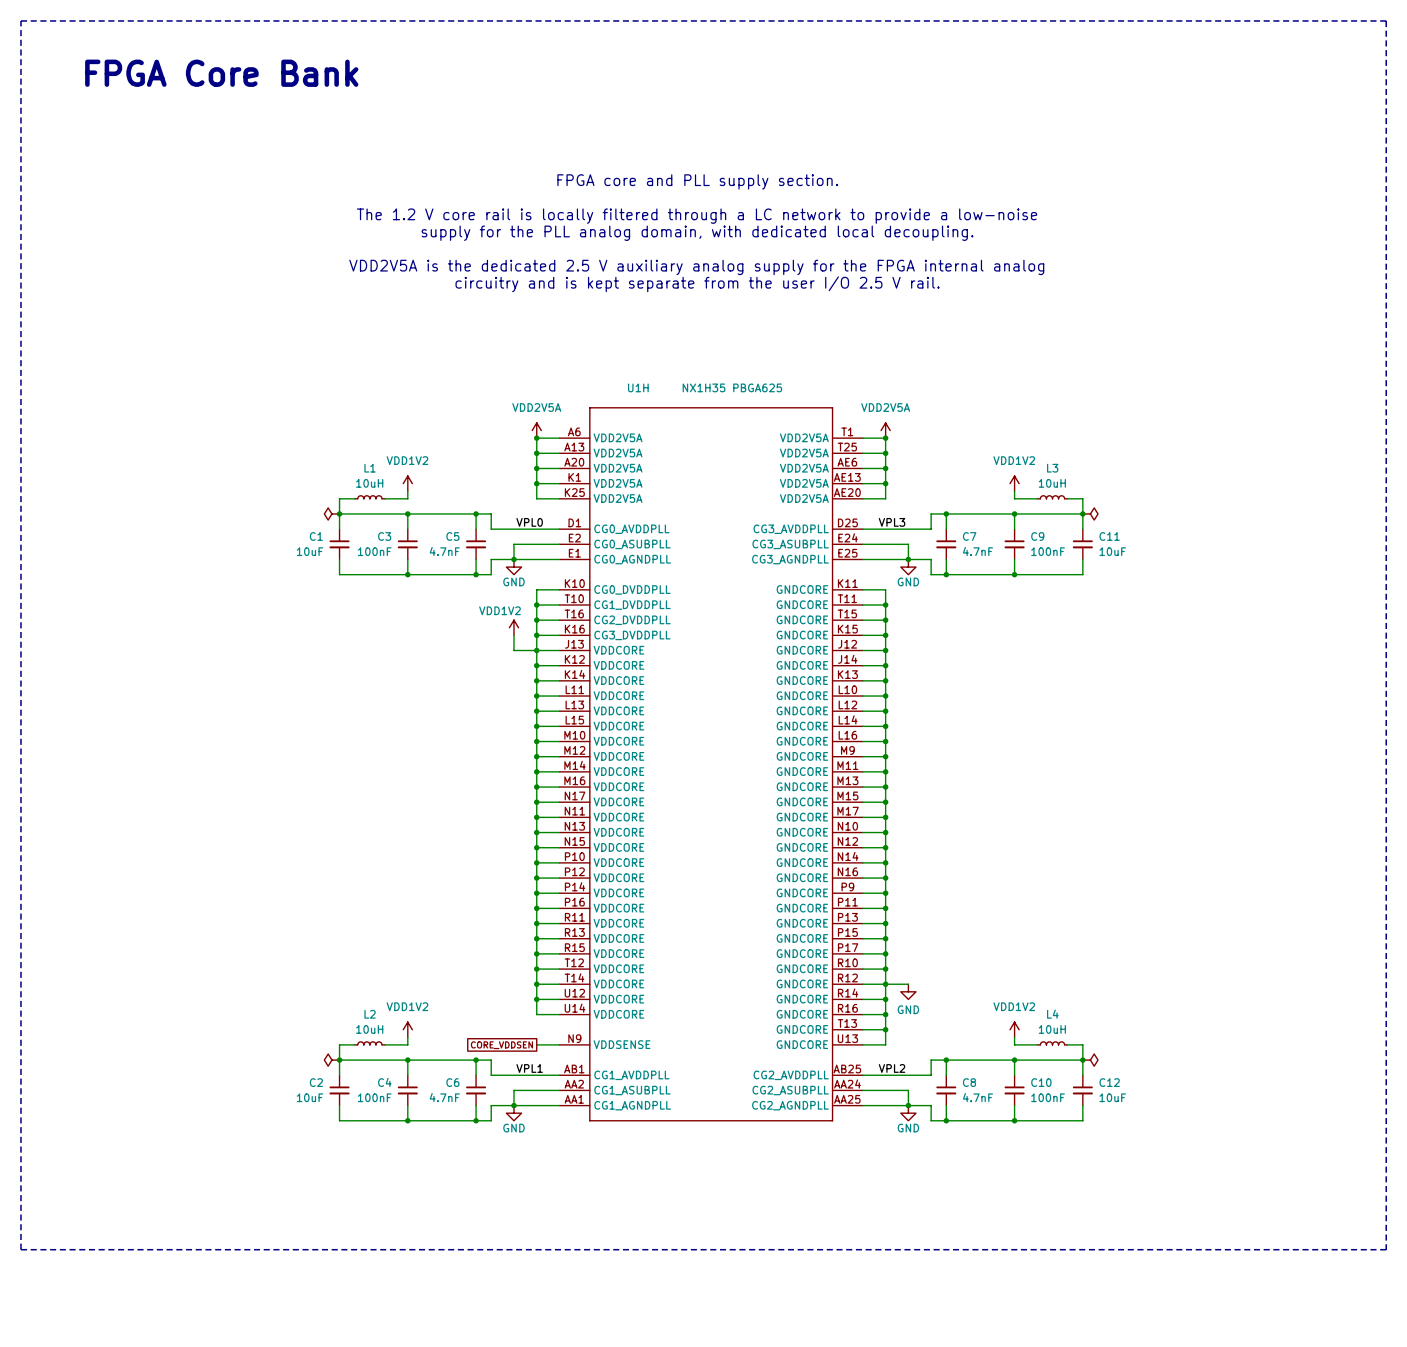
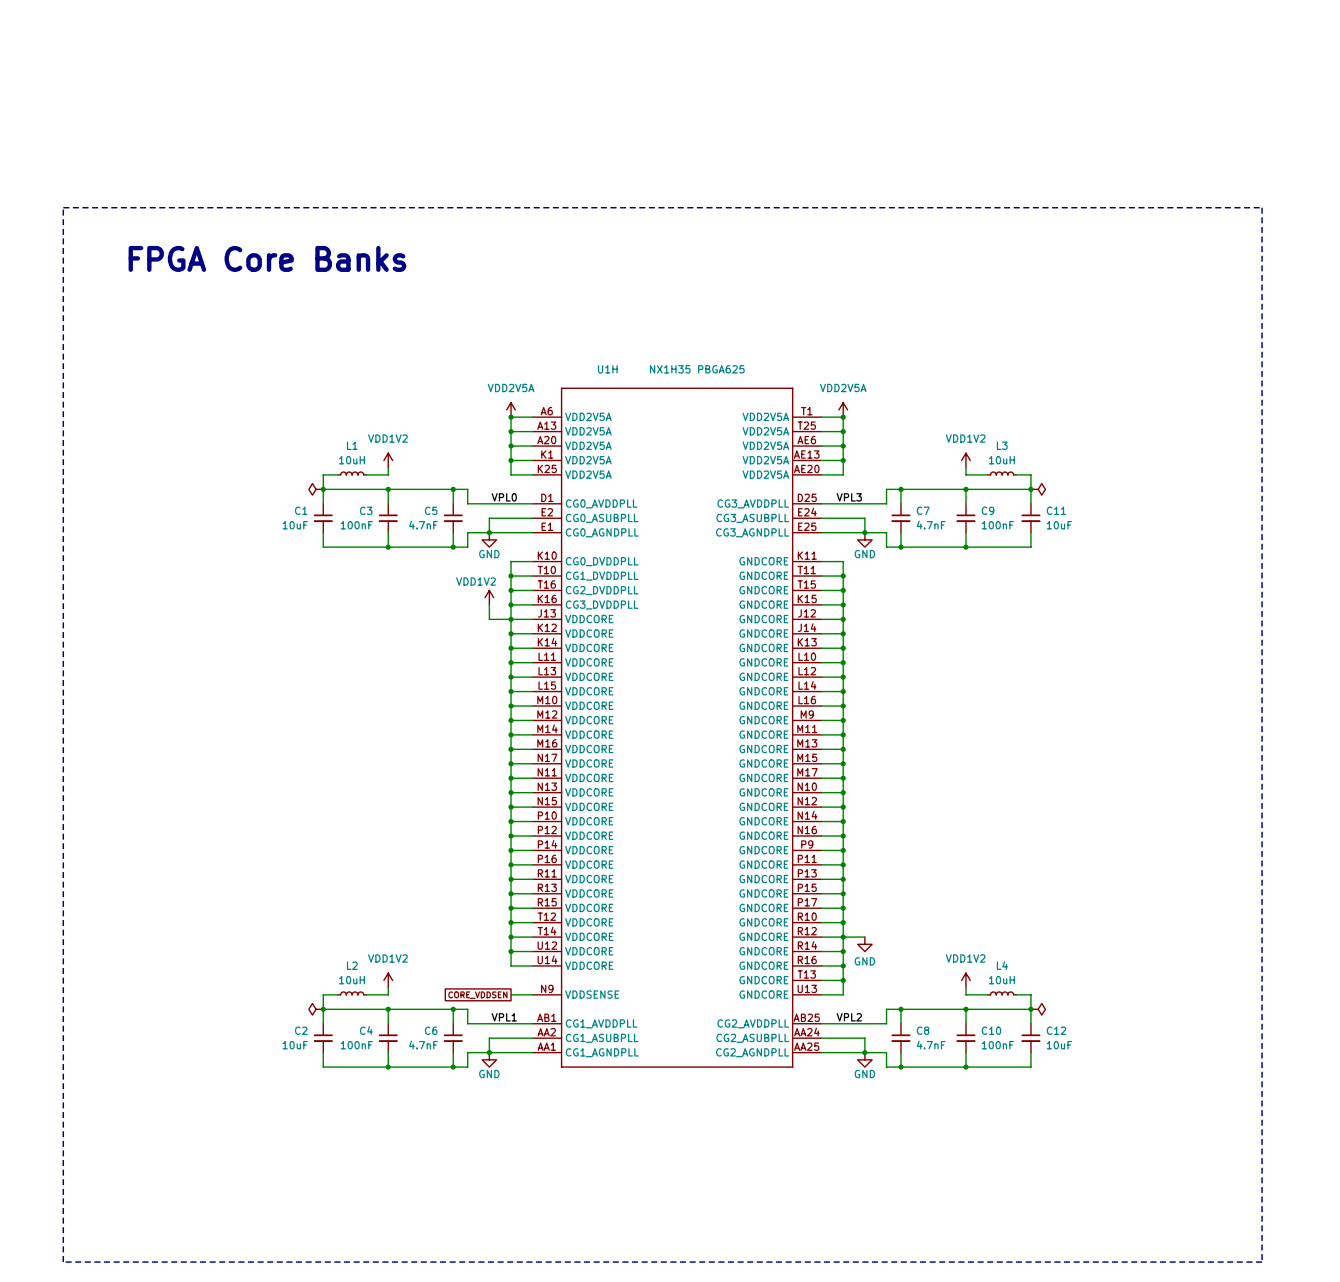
line: (20, 20) (1386, 20) (1386, 1249) (20, 1249) (20, 20) -> (63, 207) (63, 1262) (1262, 1262) (1262, 207) (63, 207)
text: FPGA Core Bank (221, 73) -> none
text: FPGA core and PLL supply section. (697, 181) -> none
text: The 1.2 V core rail is locally filtered through a LC network to provide a low-noise (697, 216) -> none
text: supply for the PLL analog domain, with dedicated local decoupling. (697, 233) -> none
text: VDD2V5A is the dedicated 2.5 V auxiliary analog supply for the FPGA internal analog (696, 267) -> none
text: none -> FPGA Core Banks (267, 258)
text: circuitry and is kept separate from the user I/O 2.5 V rail. (697, 284) -> none

